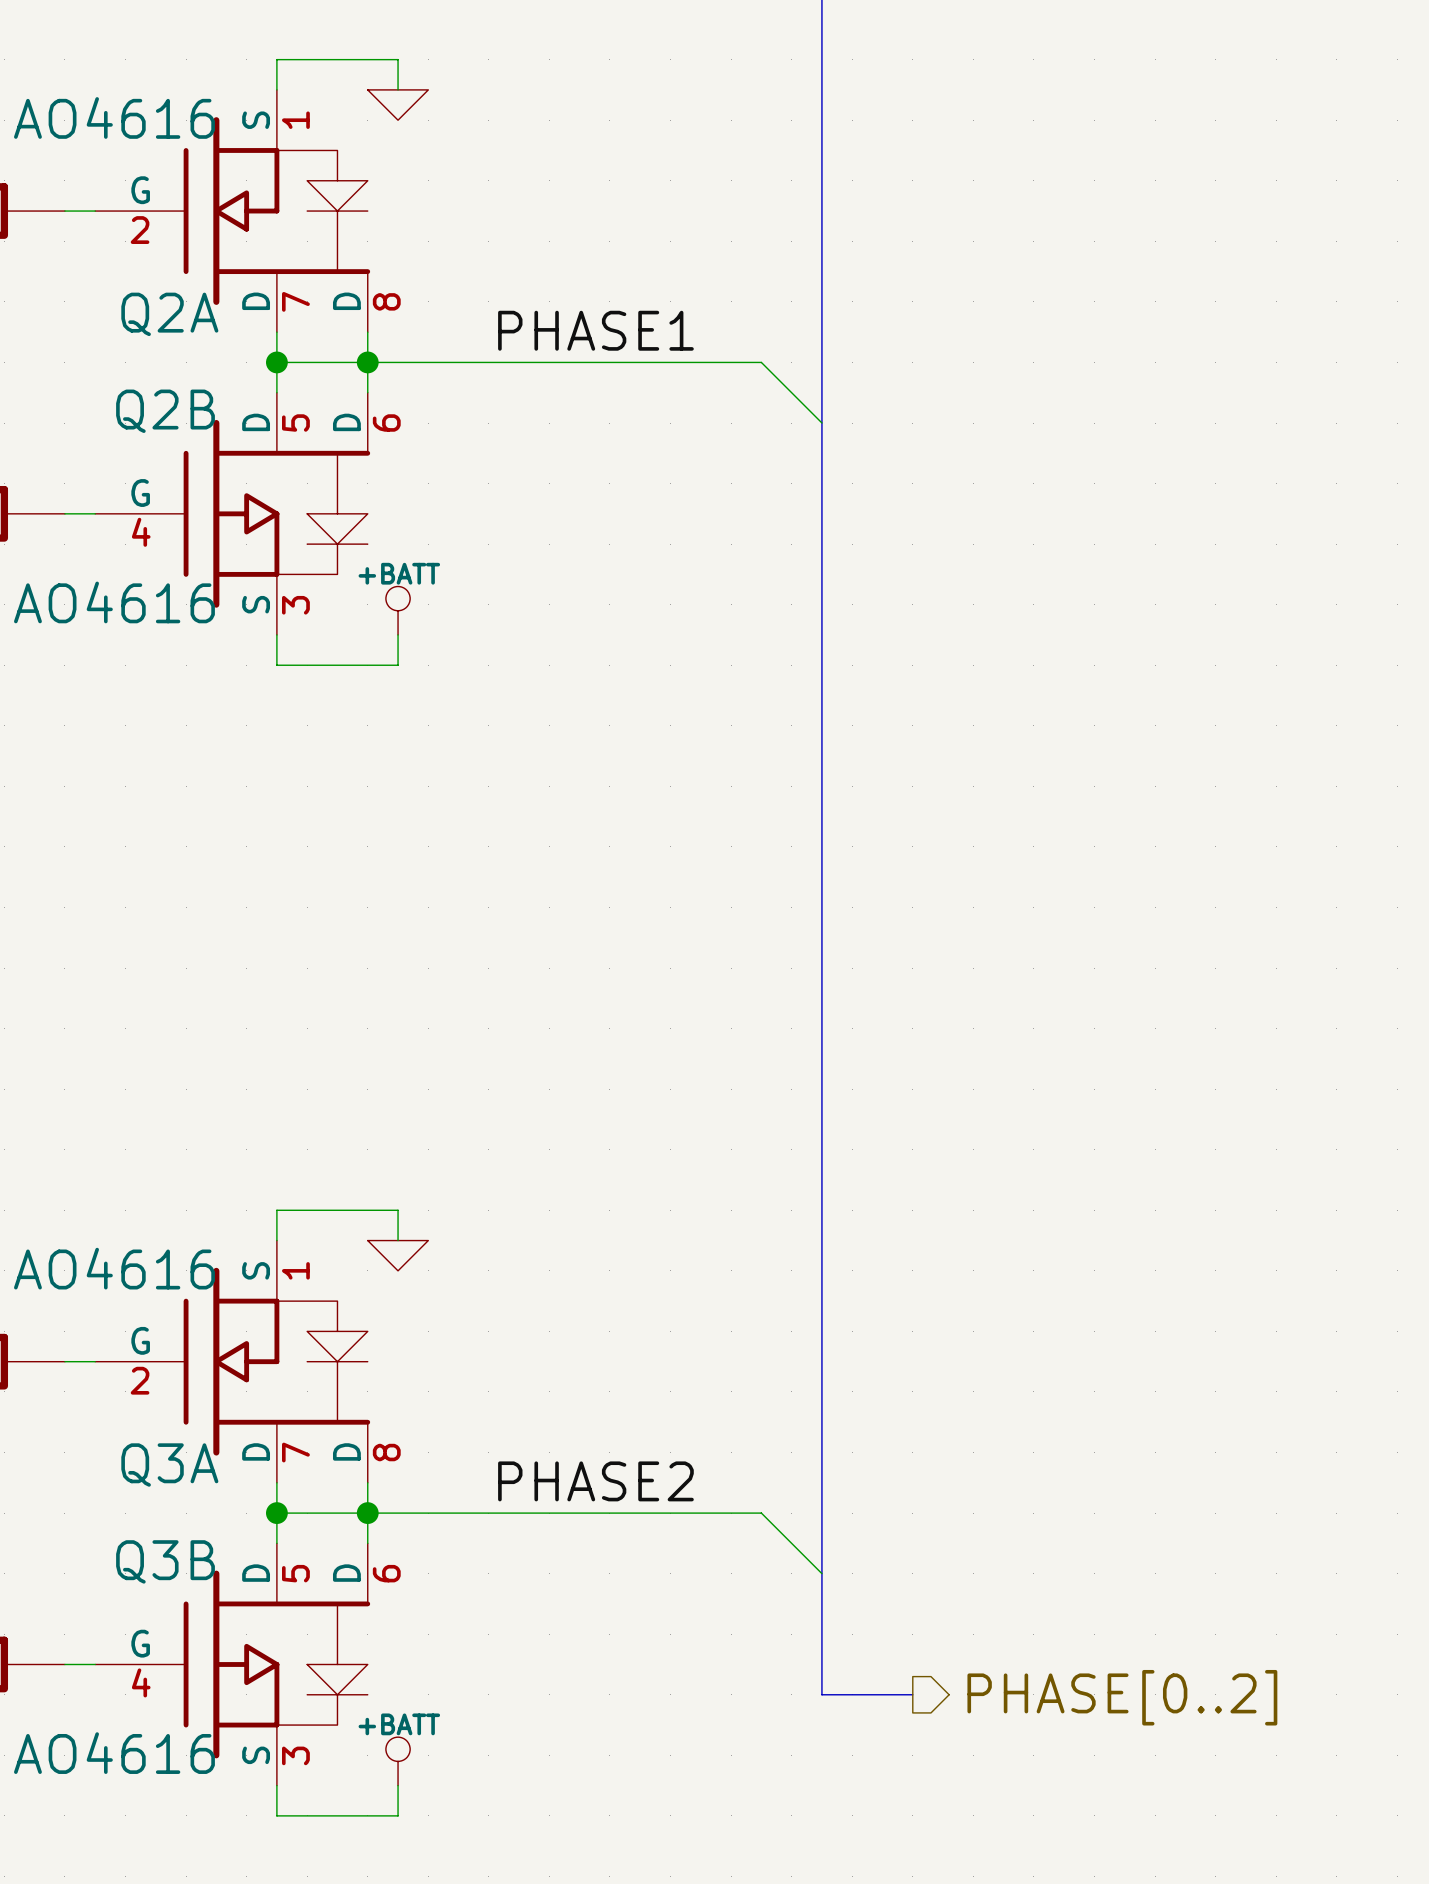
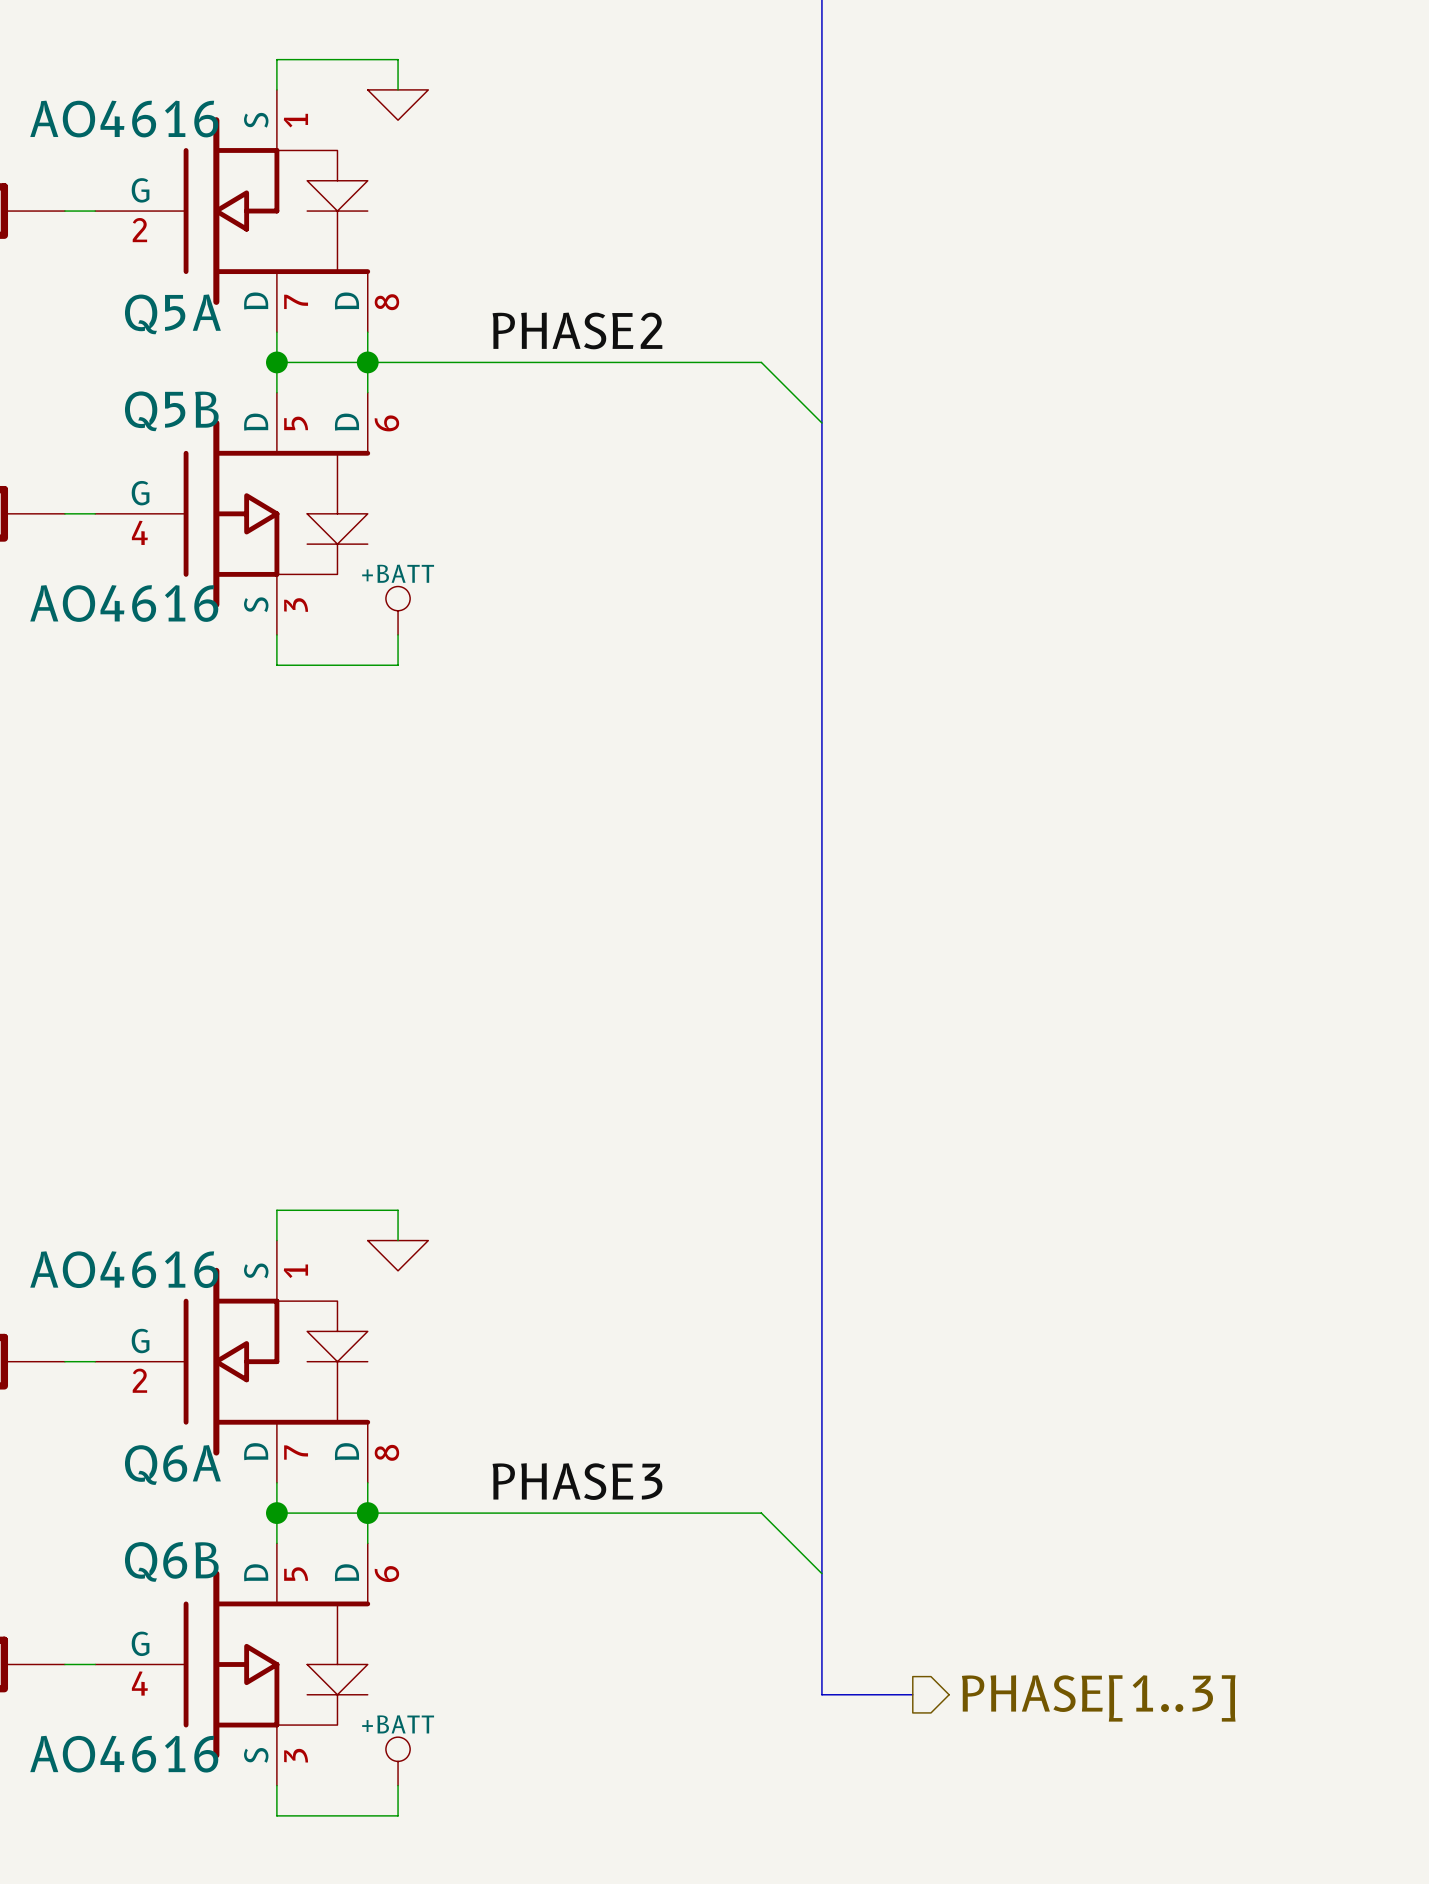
Q2A name: Q2A (169, 314) -> Q5A (172, 314)
label: PHASE1 (595, 330) -> PHASE2 (577, 330)
Q2B name: Q2B (165, 411) -> Q5B (171, 411)
Q3A name: Q3A (169, 1465) -> Q6A (172, 1465)
label: PHASE2 (595, 1481) -> PHASE3 (577, 1481)
Q3B name: Q3B (165, 1561) -> Q6B (171, 1561)
hierarchical label: PHASE[0..2] (1122, 1697) -> PHASE[1..3] (1098, 1698)

